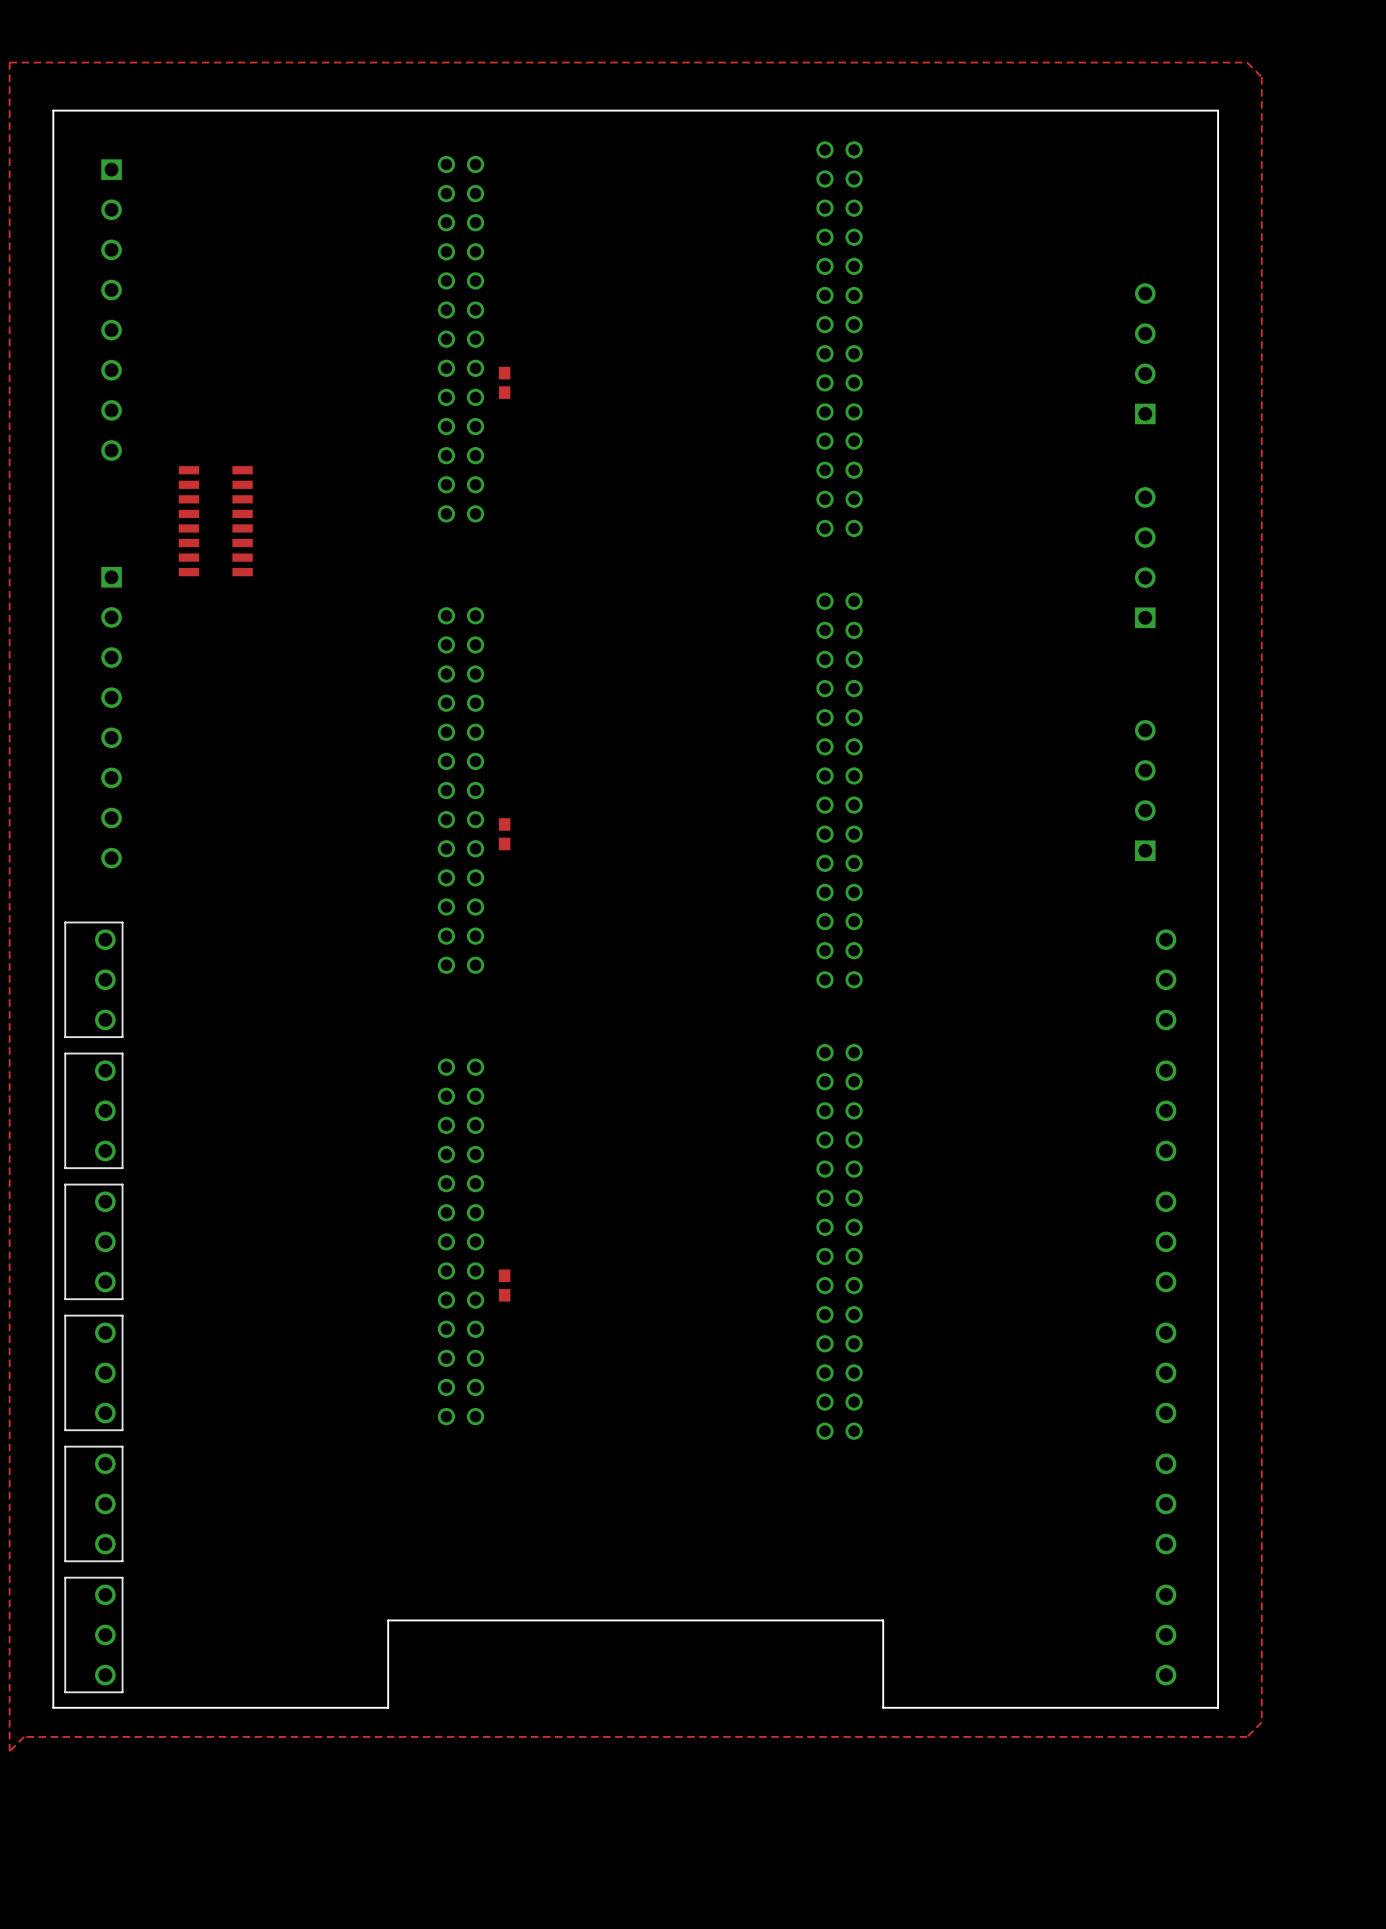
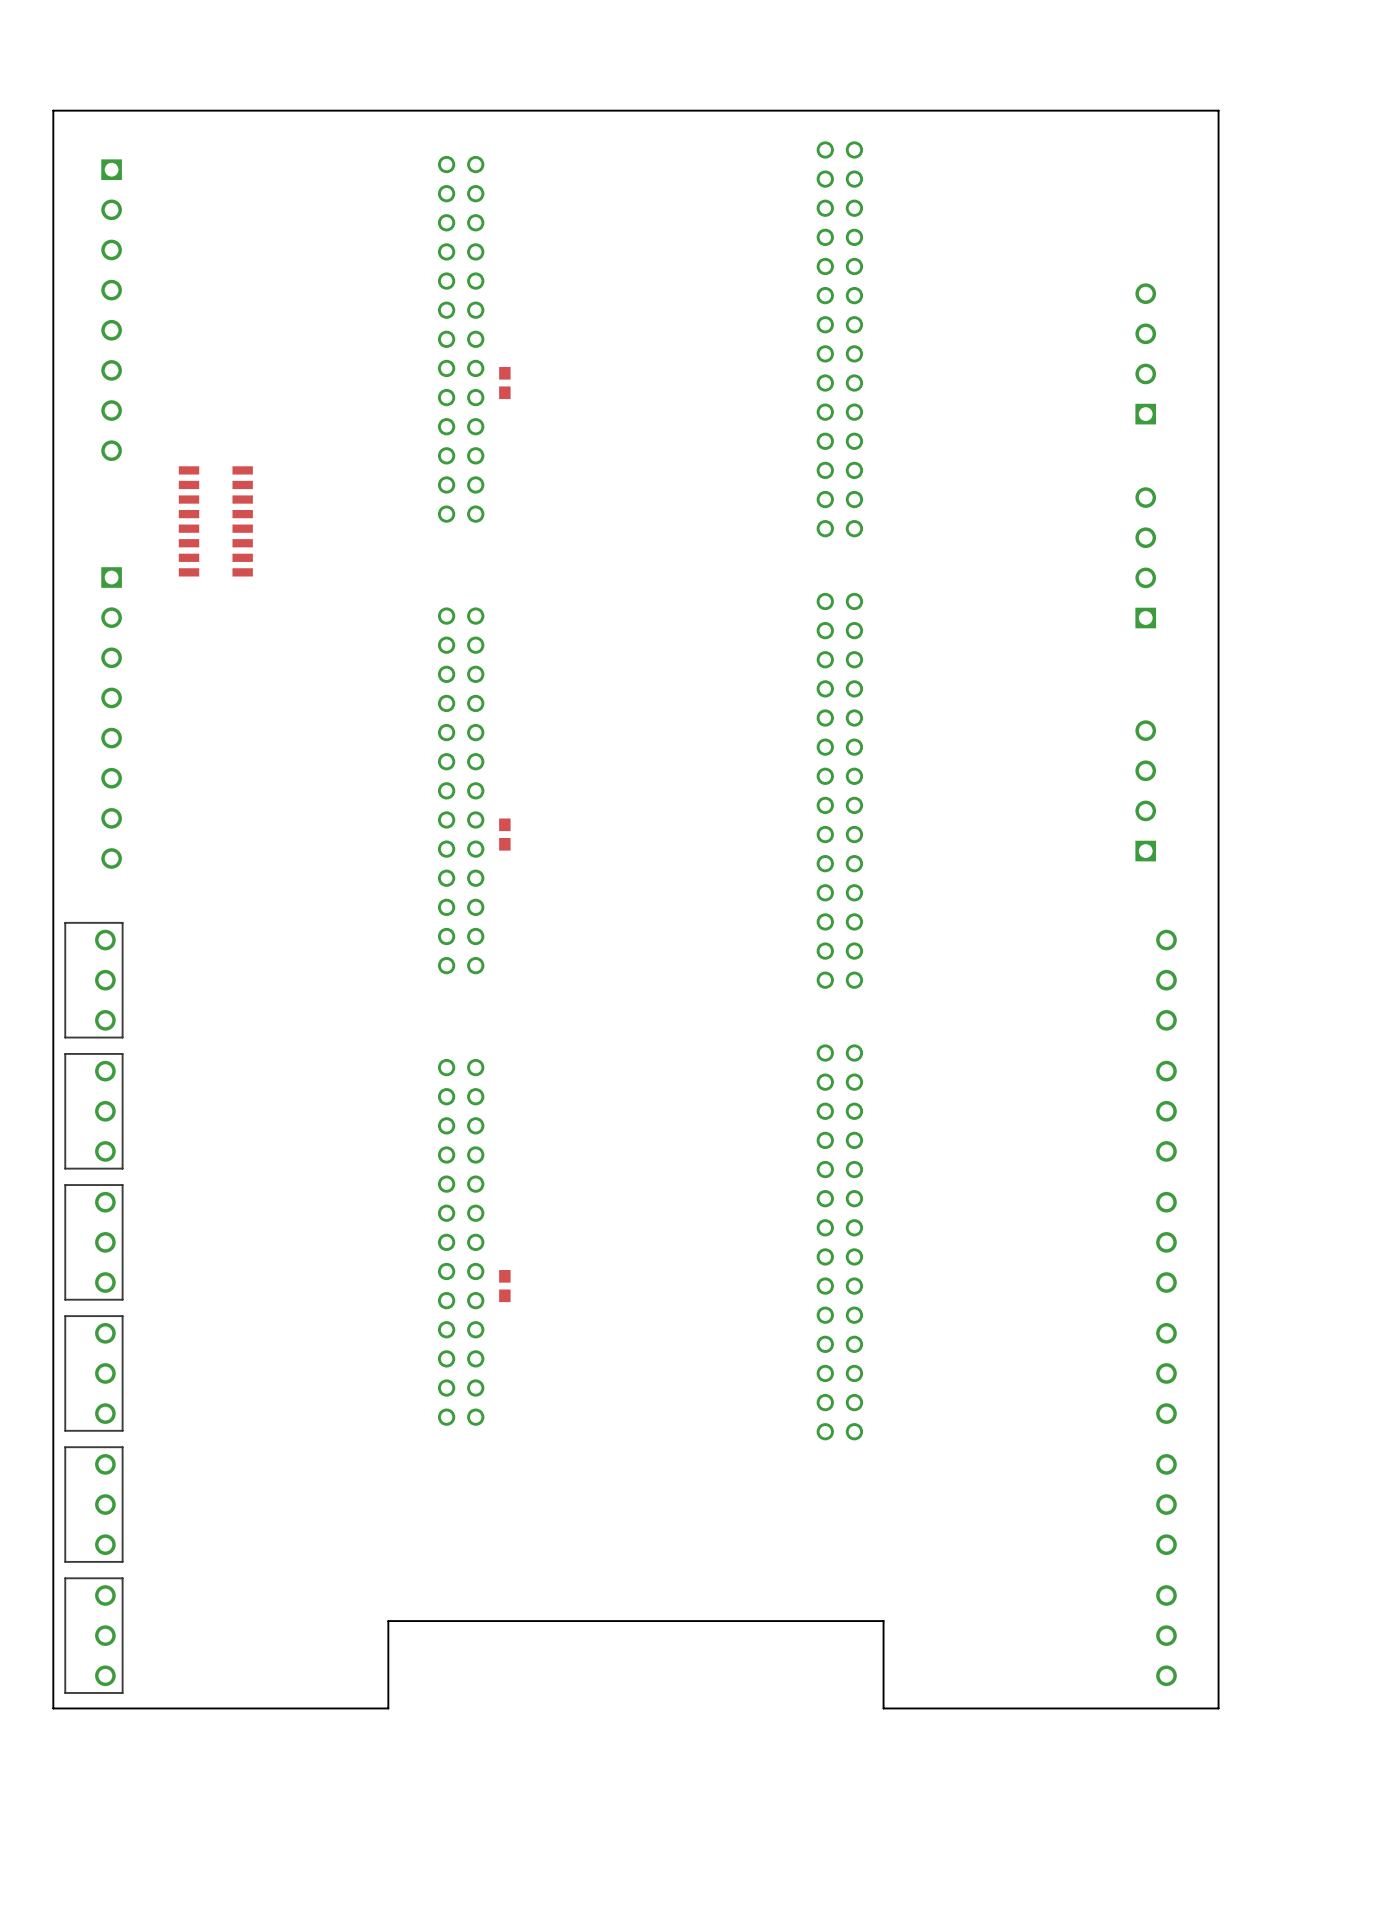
top zone outline: (1247, 62) (9, 62) (9, 1751) (24, 1736) (1247, 1736) (1261, 1722) (1261, 77) (1247, 62) -> none

